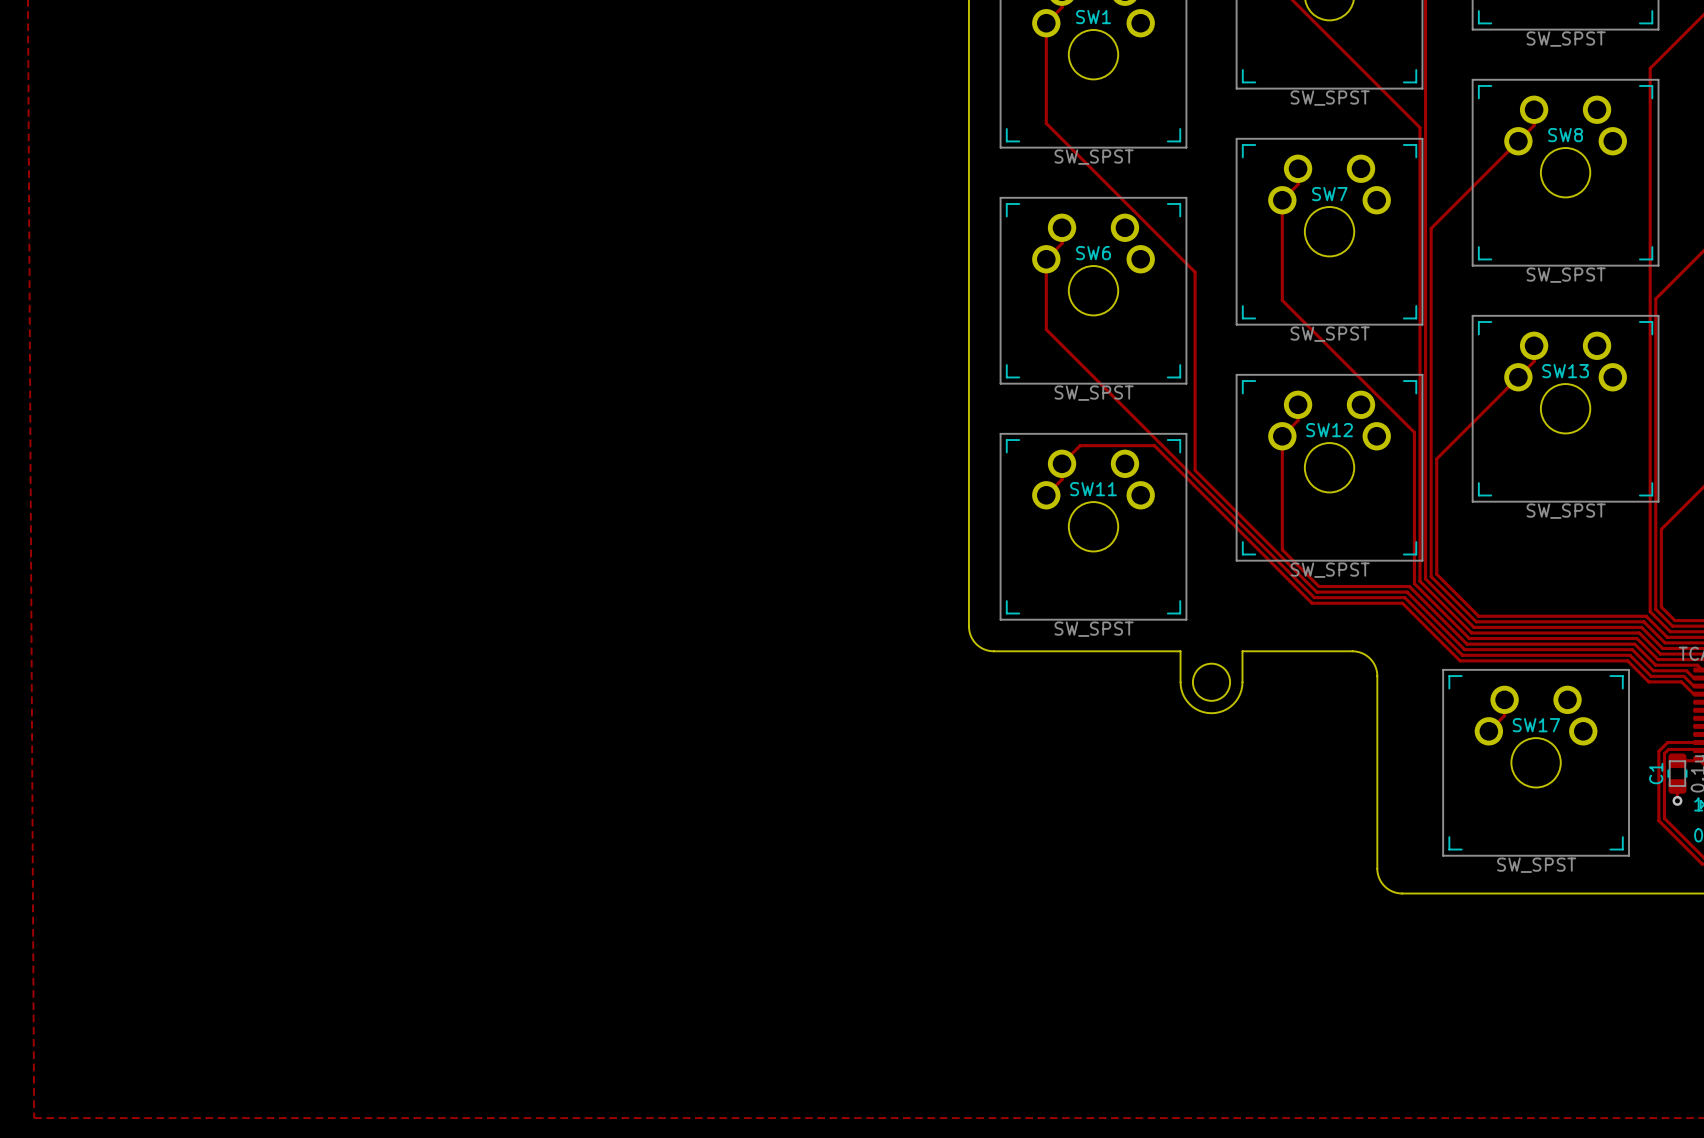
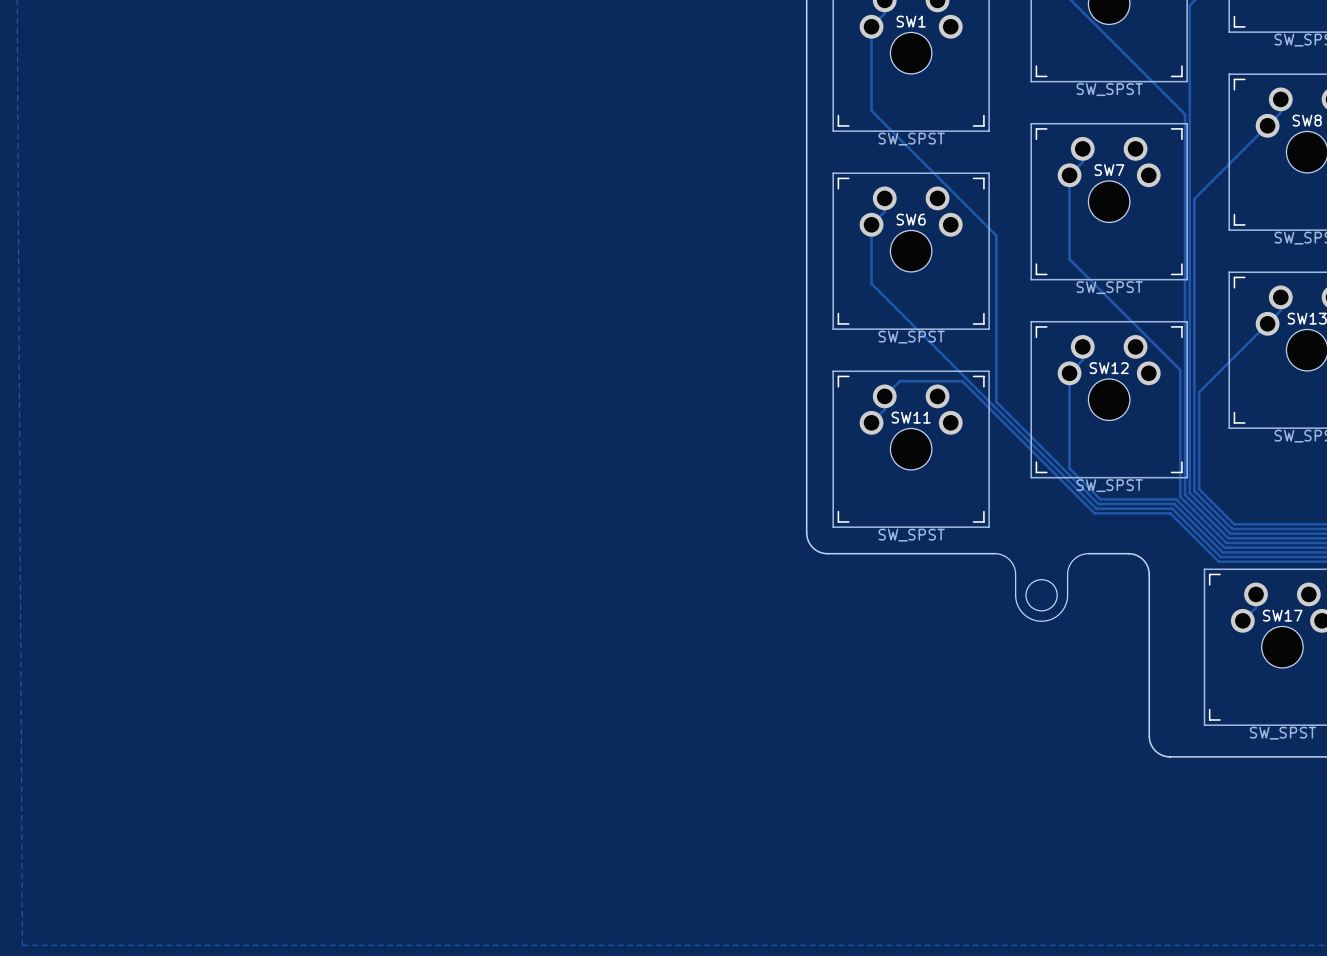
board edge: (1180, 651) (1180, 686) (1184, 697) (1196, 709) (1211, 713) (1227, 709) (1238, 697) (1242, 686) (1242, 651) (1304, 651) -> (984, 553) (1001, 554) (1011, 561) (1015, 572) (1015, 598) (1018, 607) (1029, 618) (1041, 621) (1053, 618) (1062, 610) (1067, 598) (1069, 565) (1077, 556) (1088, 553)
round board edge: [1192, 662, 1232, 702] -> none
round board edge: none -> [1025, 579, 1058, 612]

